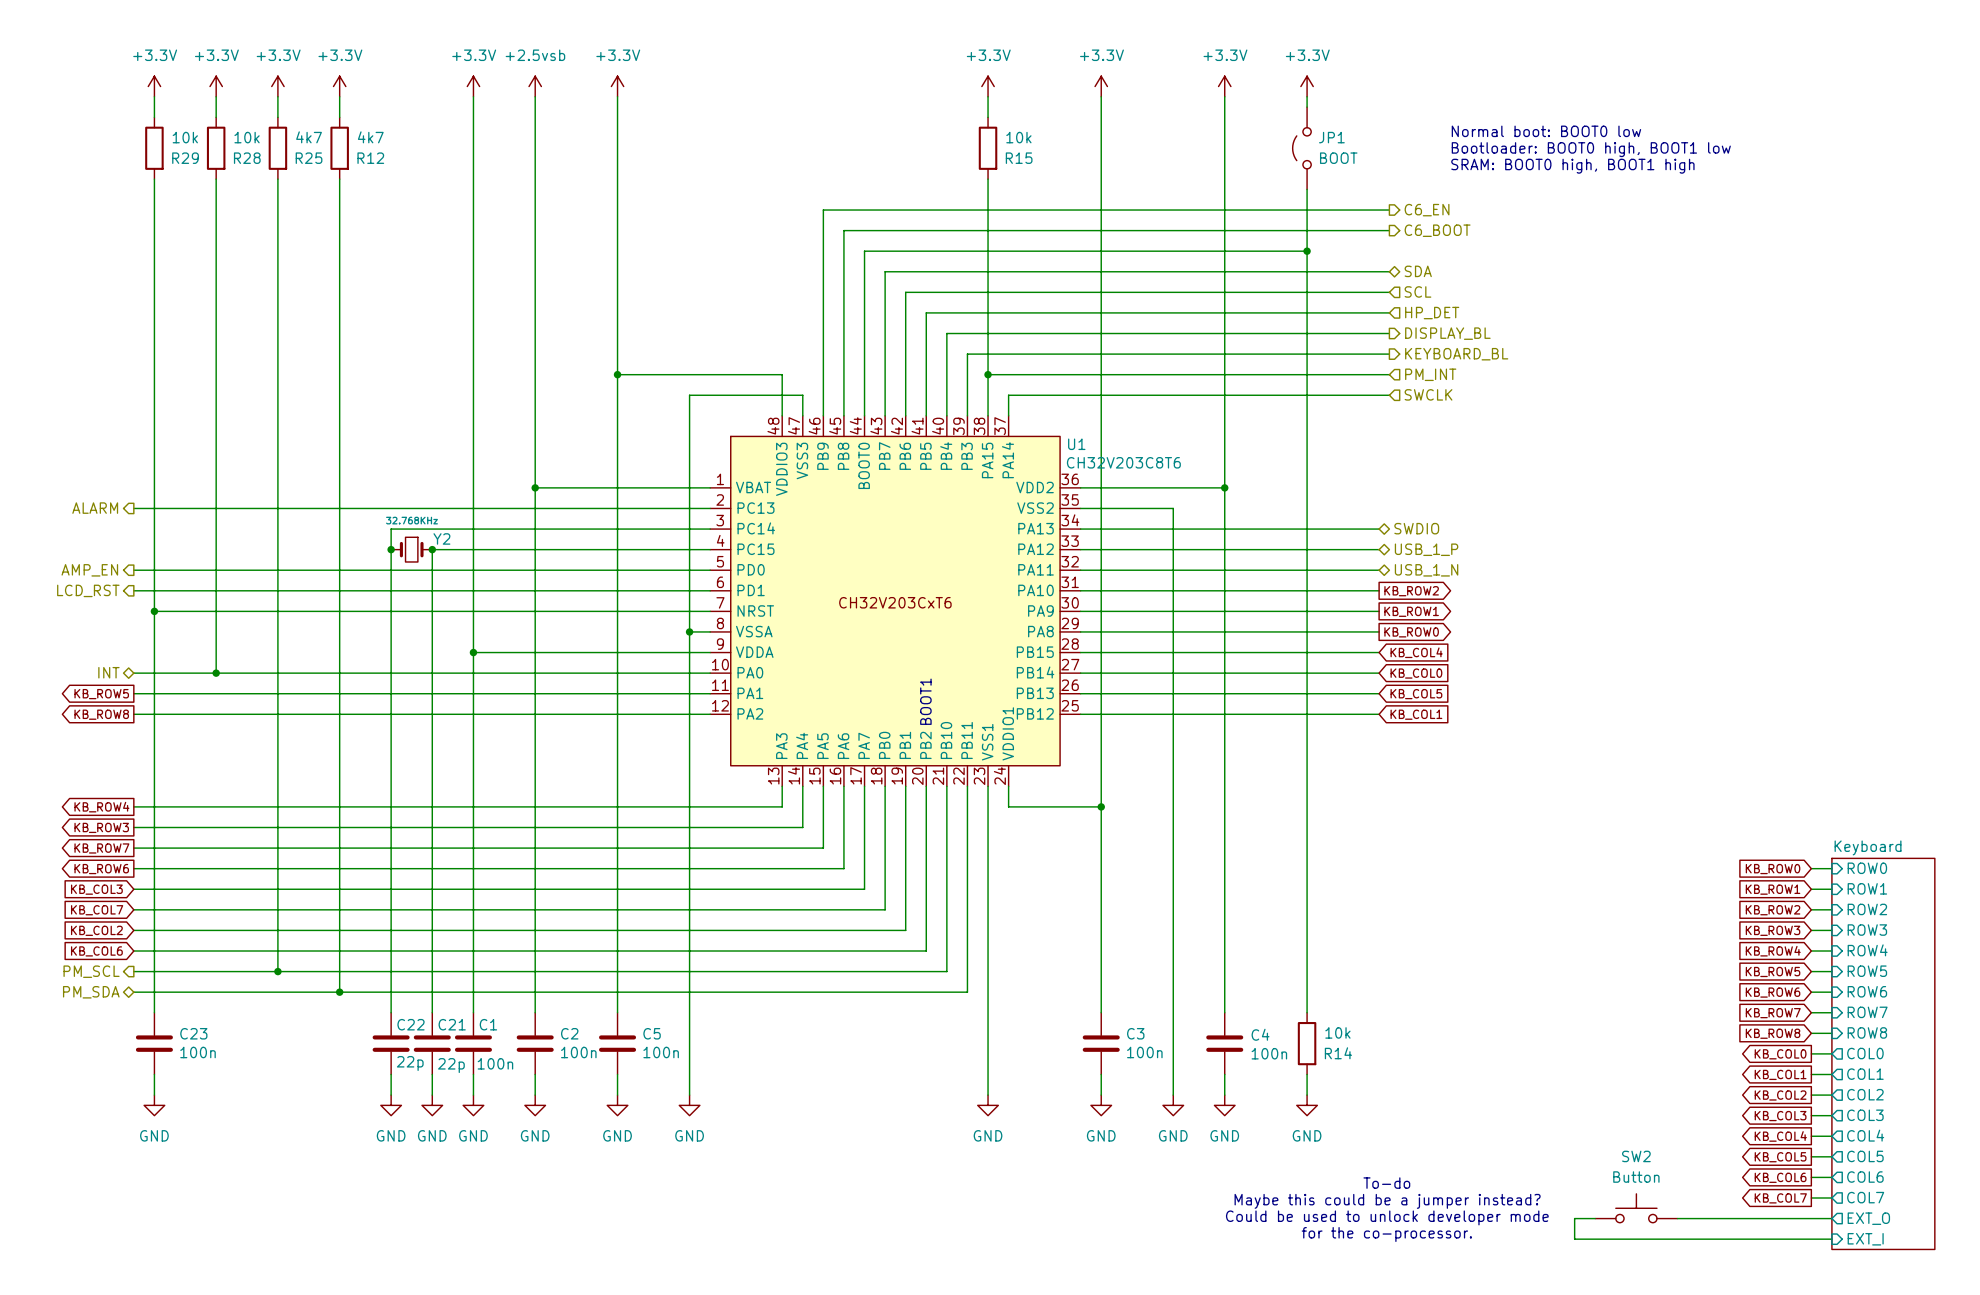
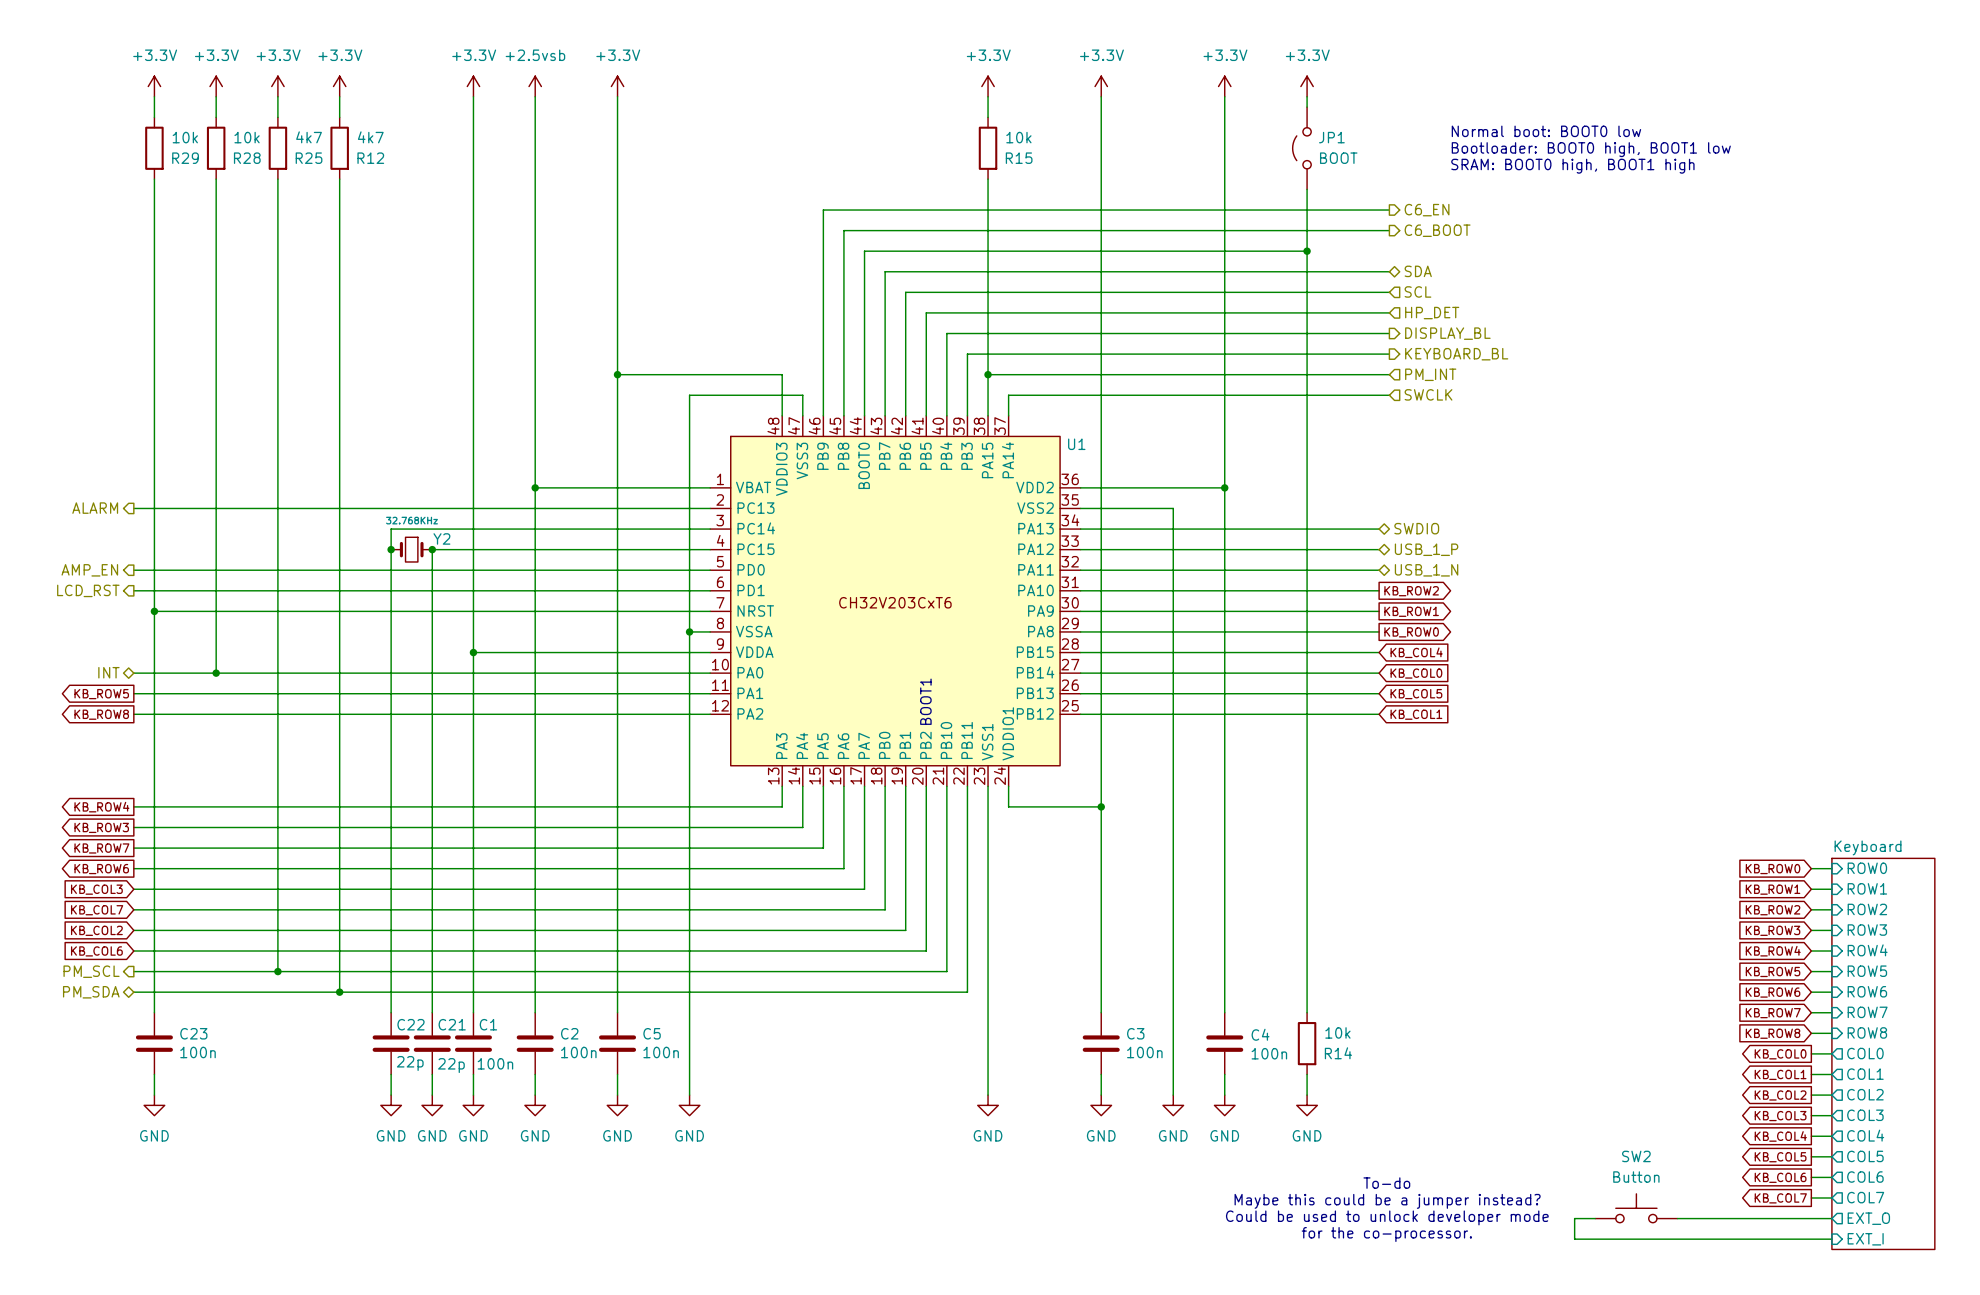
U1 value: CH32V203C8T6 (1123, 462) -> none

